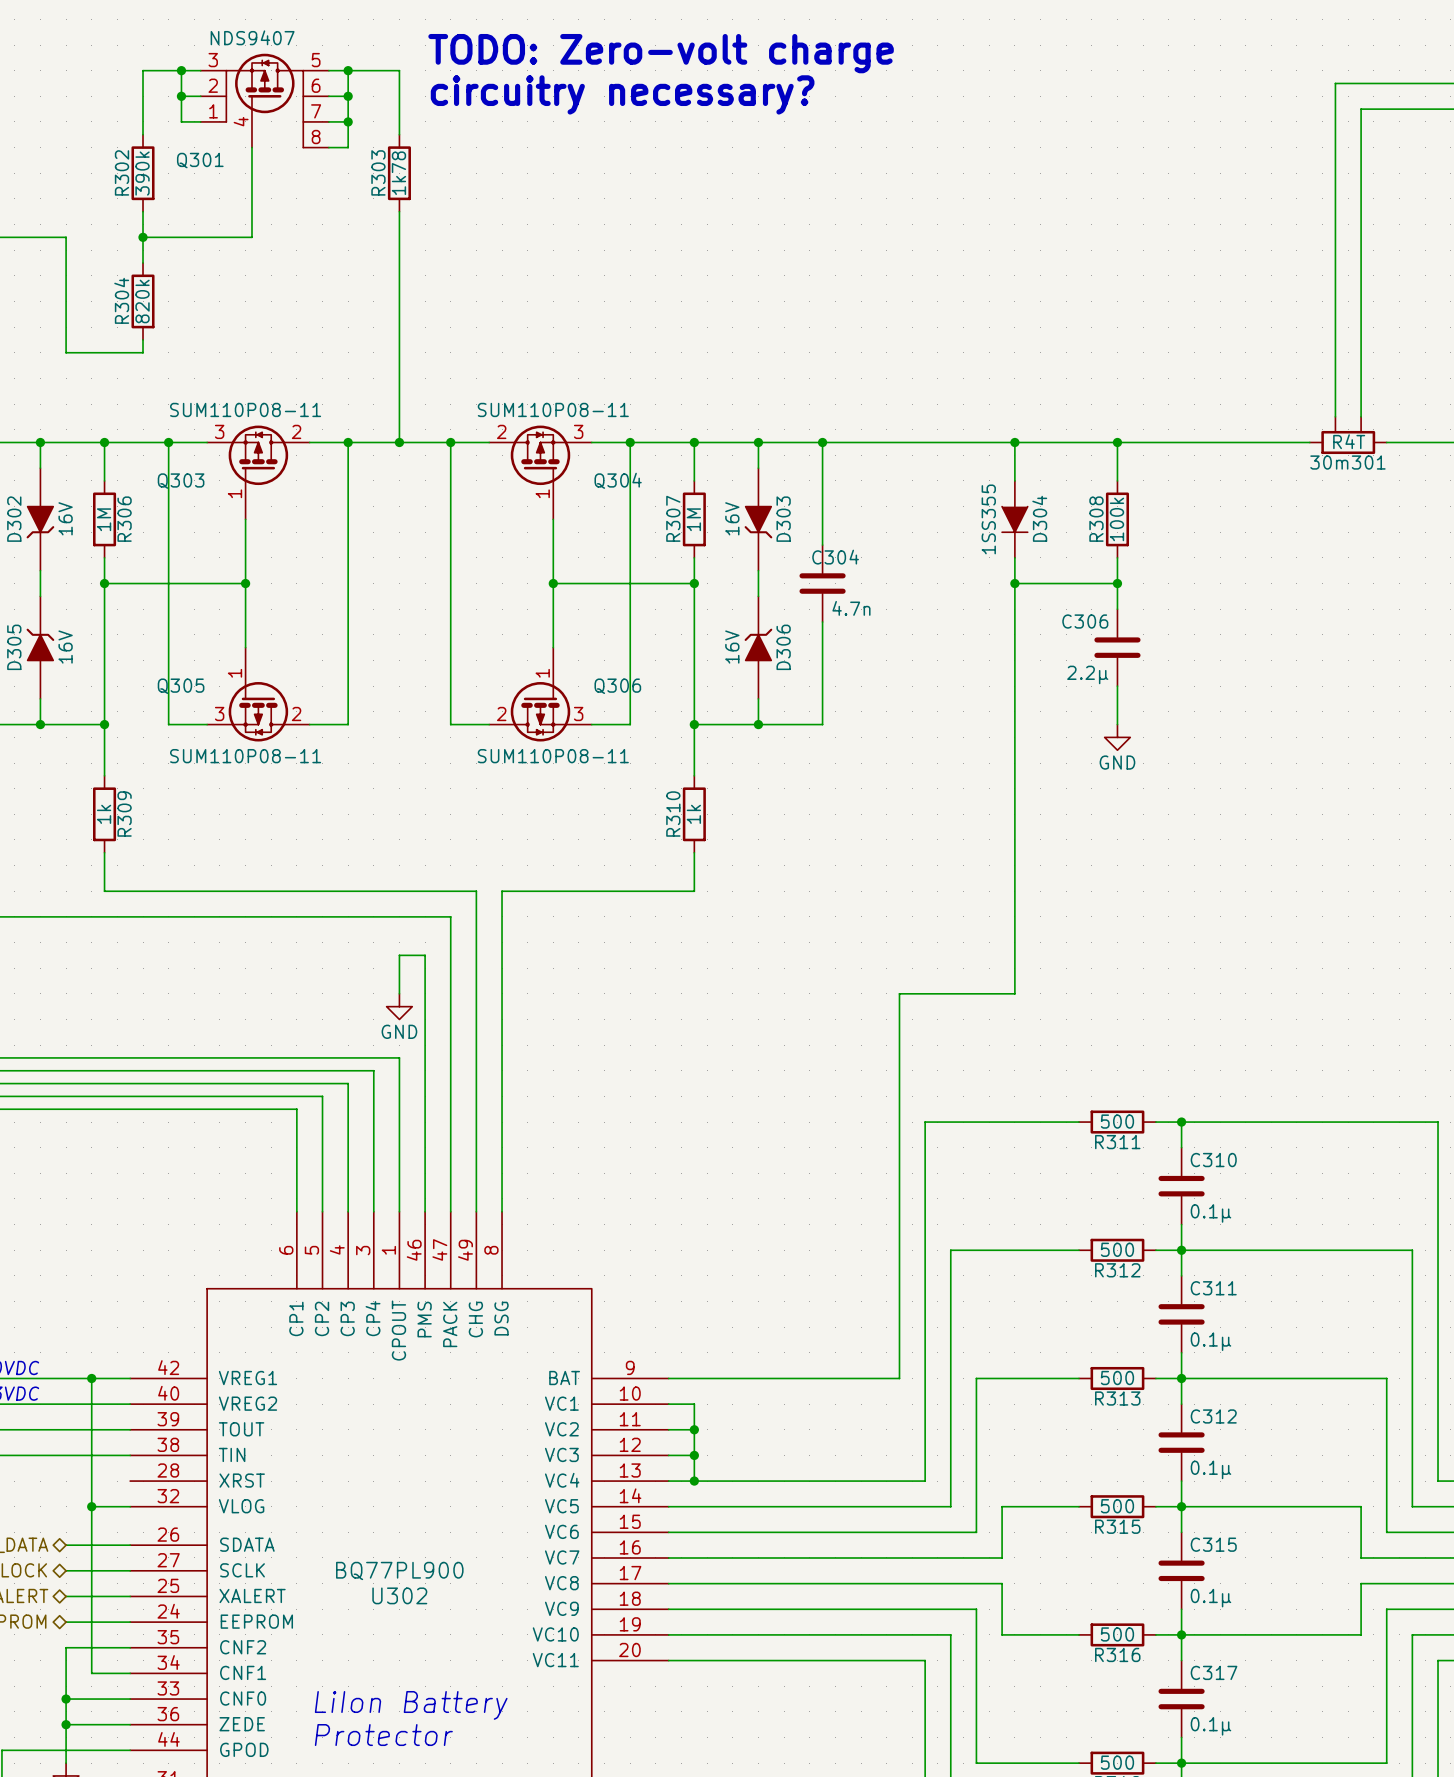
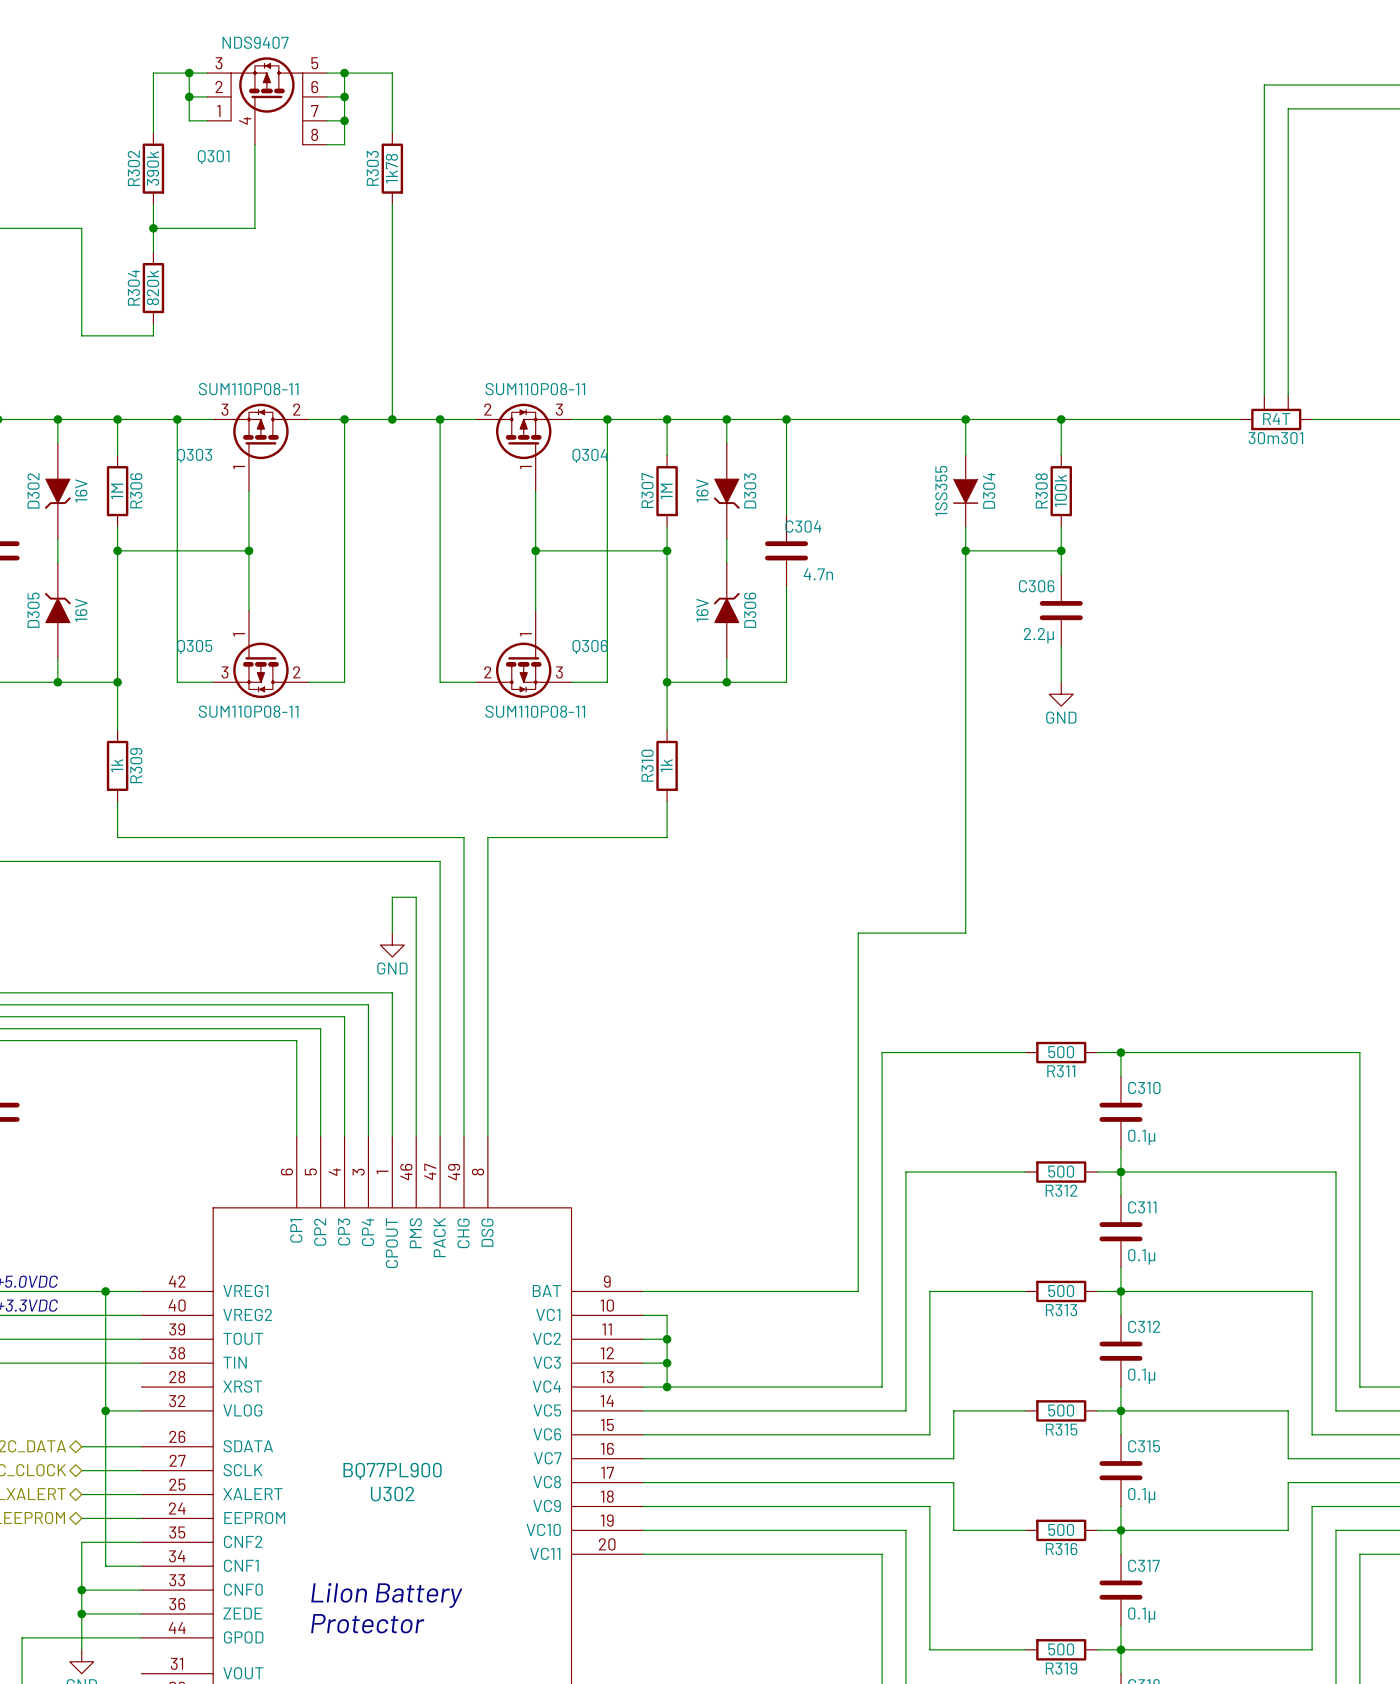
text: TODO: Zero-volt charge (661, 53) -> none
text: circuitry necessary? (622, 94) -> none

